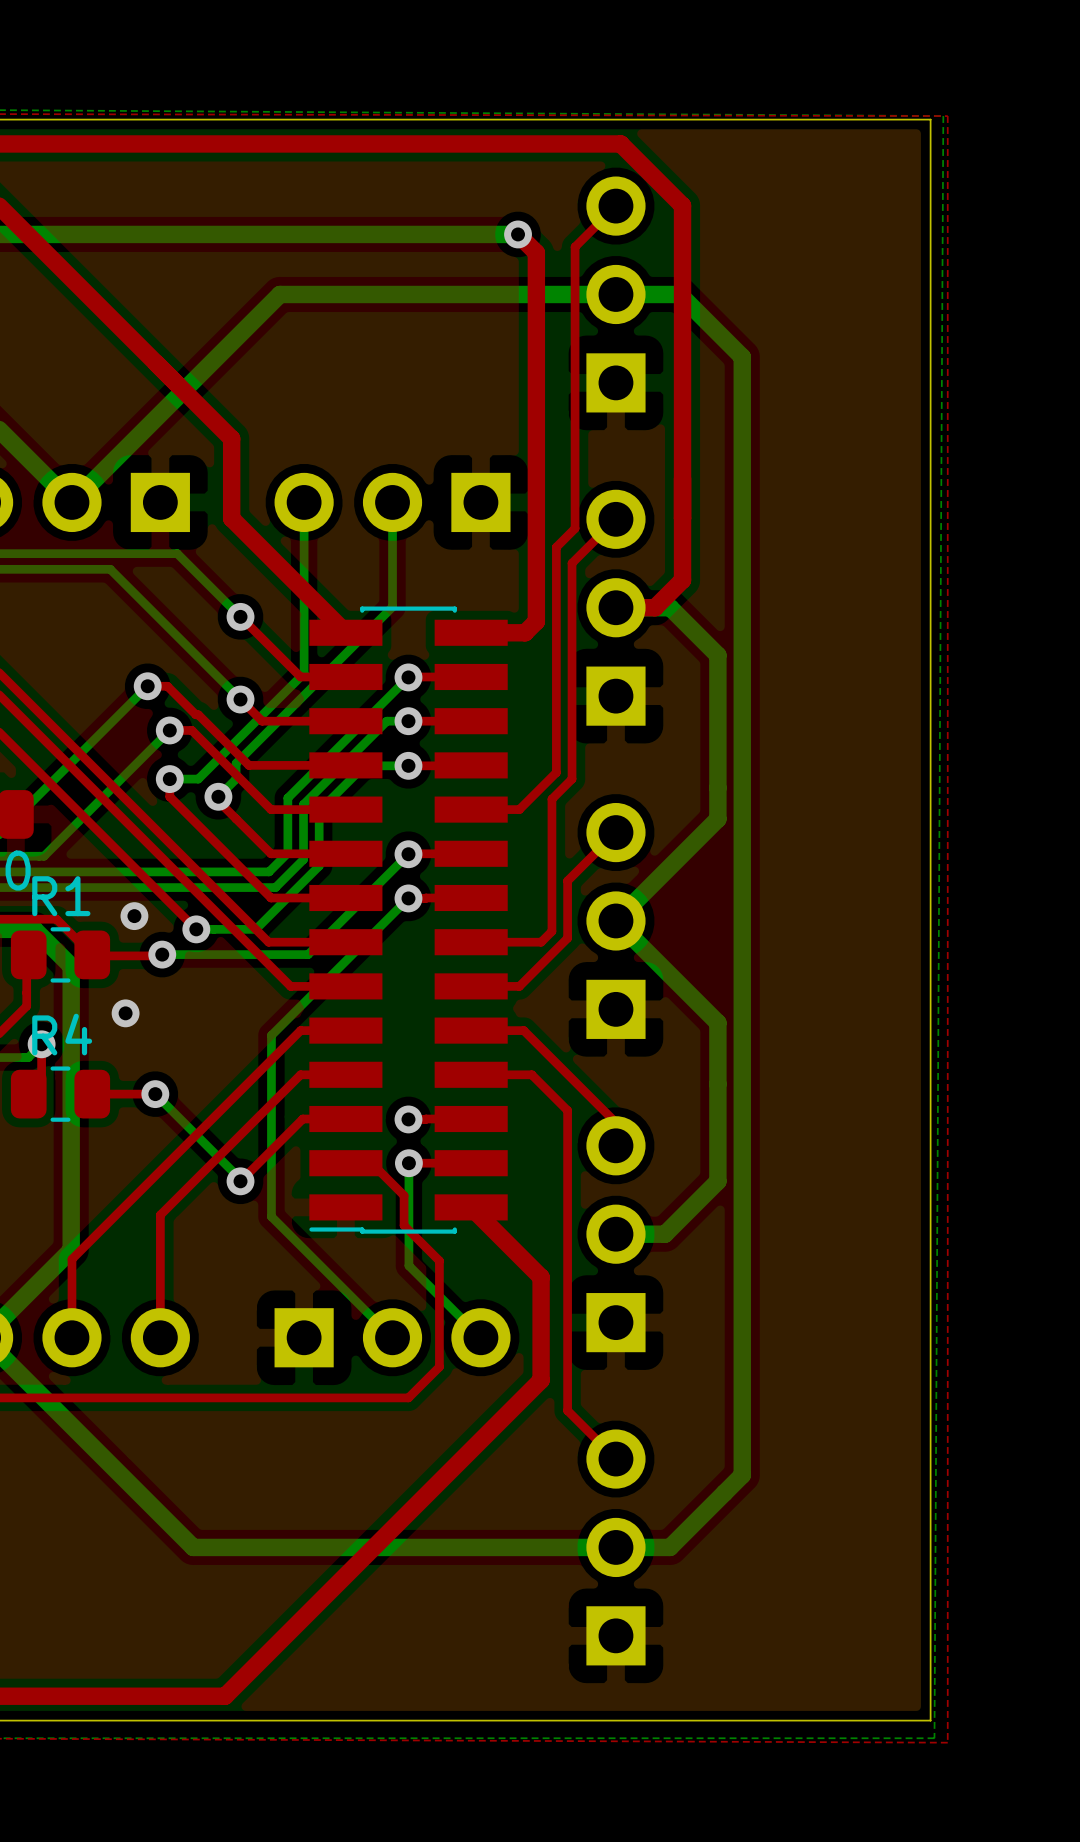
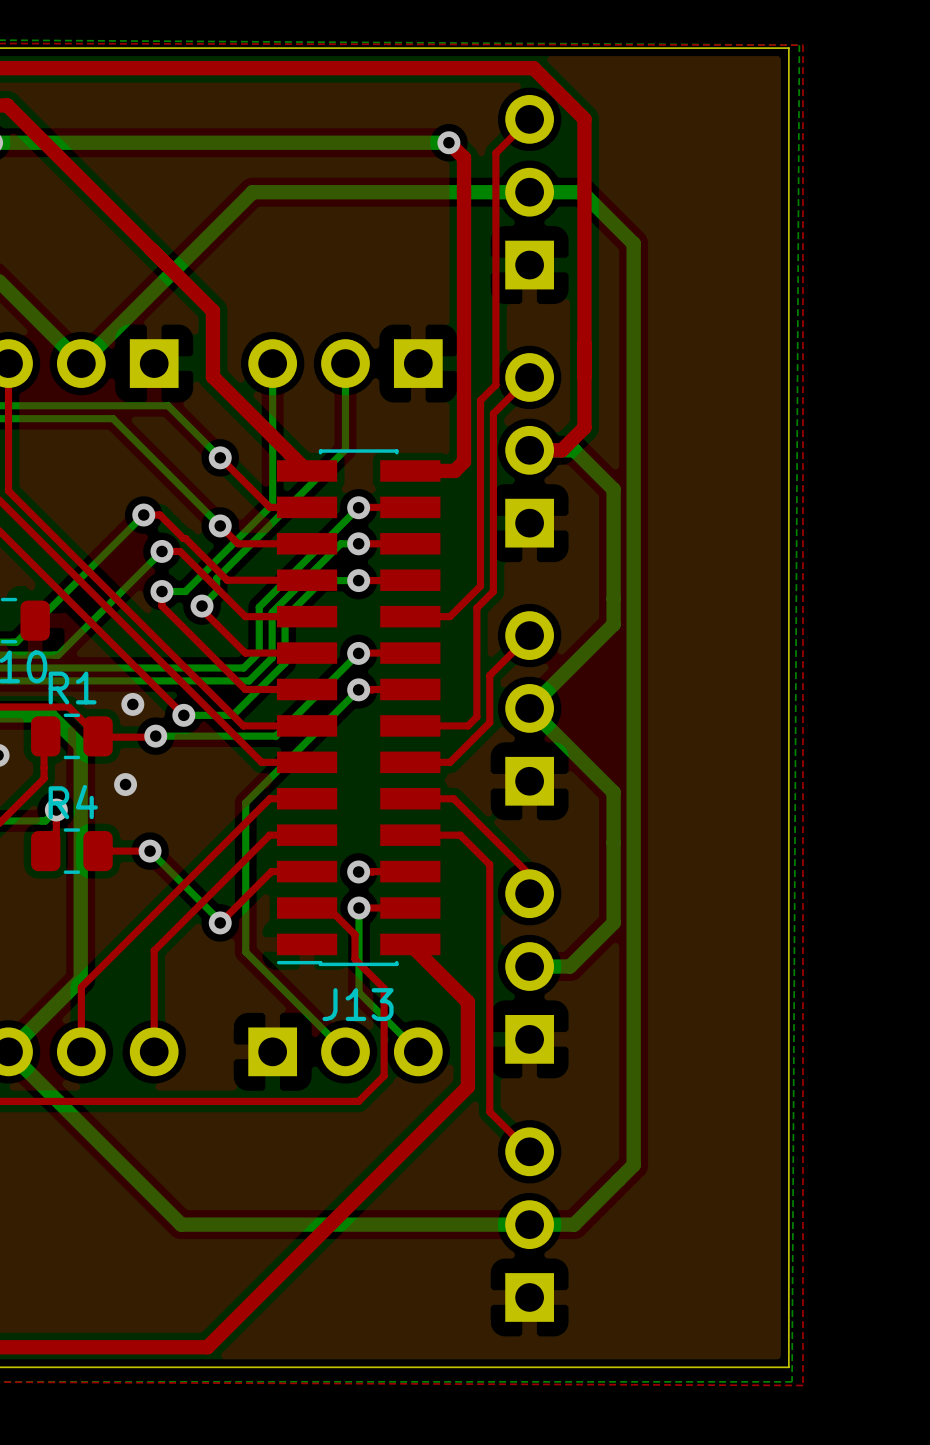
J13 name: none -> J13 (358, 1004)

